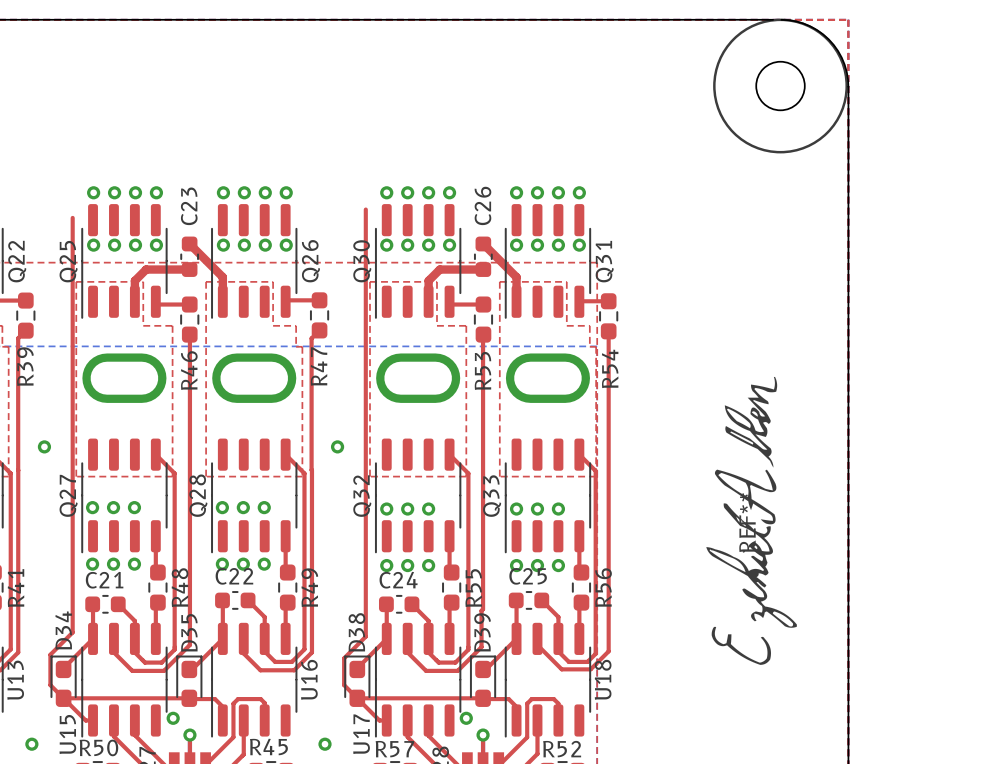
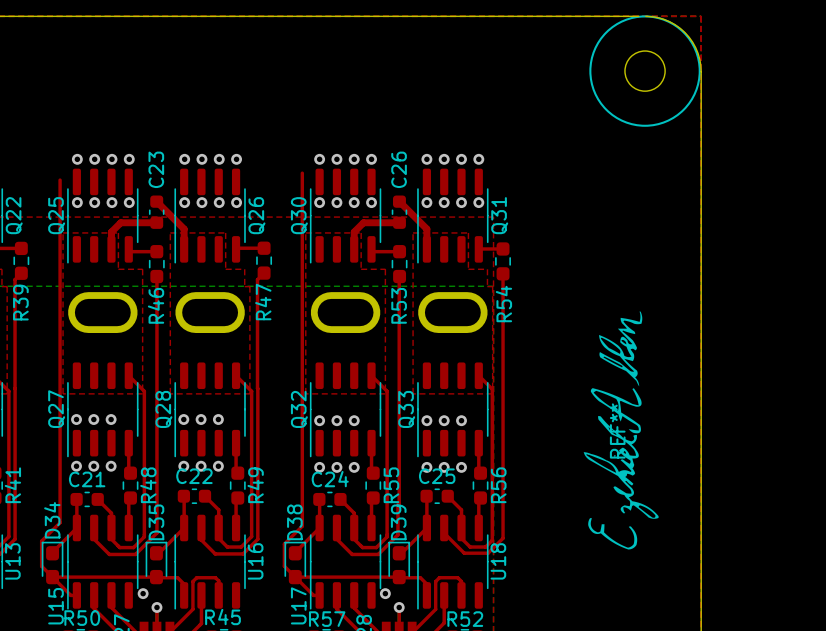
via: (44, 446) -> none
via: (337, 446) -> none
via: (31, 744) -> none
via: (325, 744) -> none

